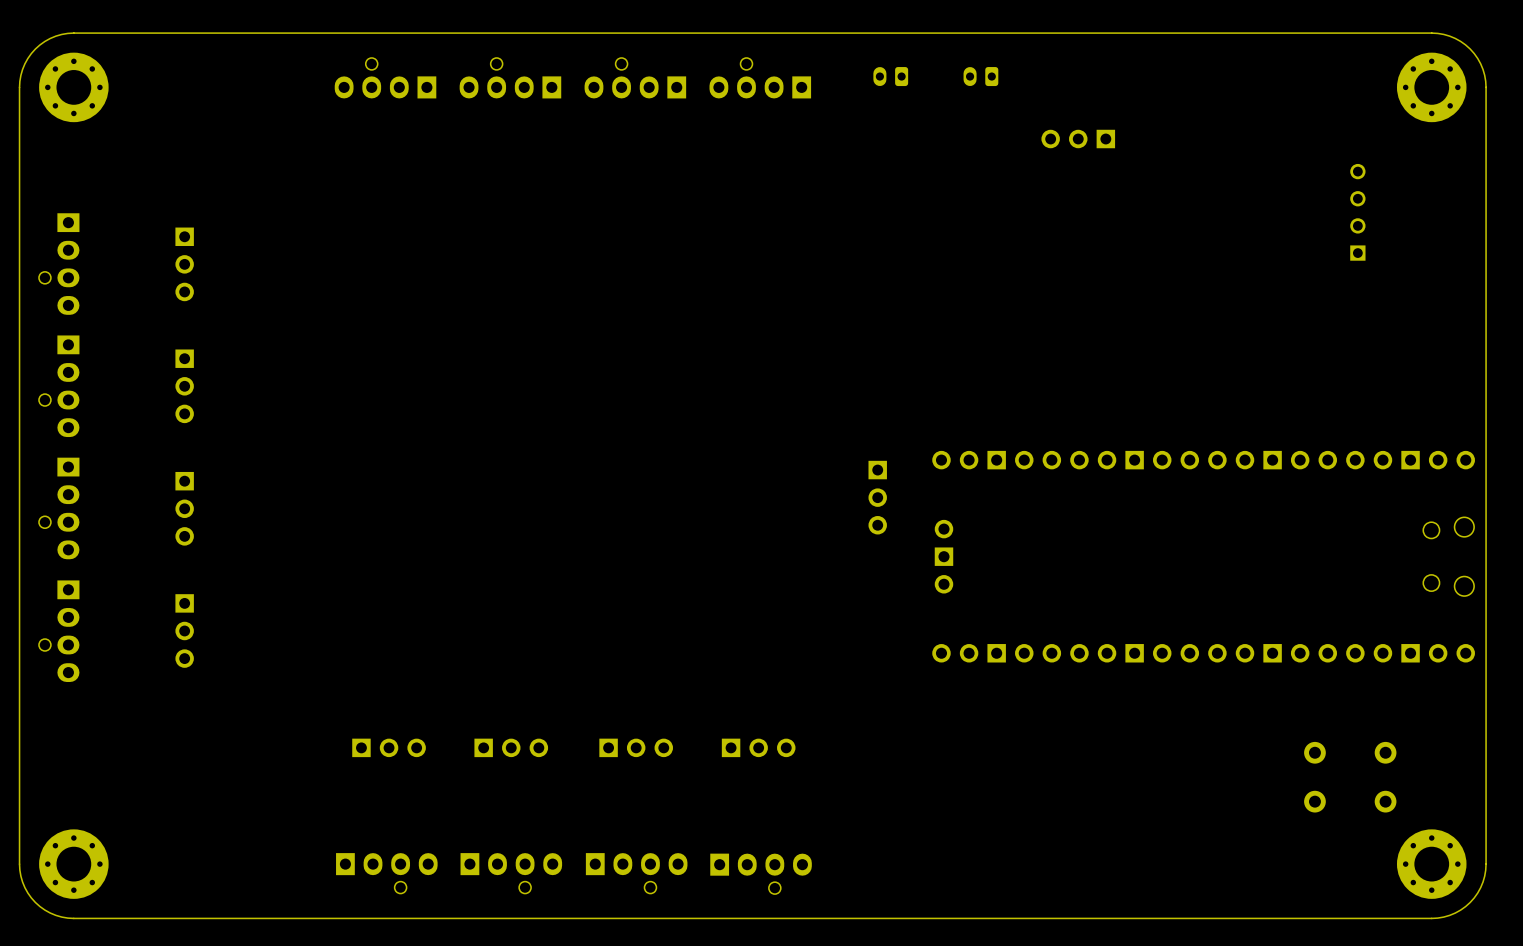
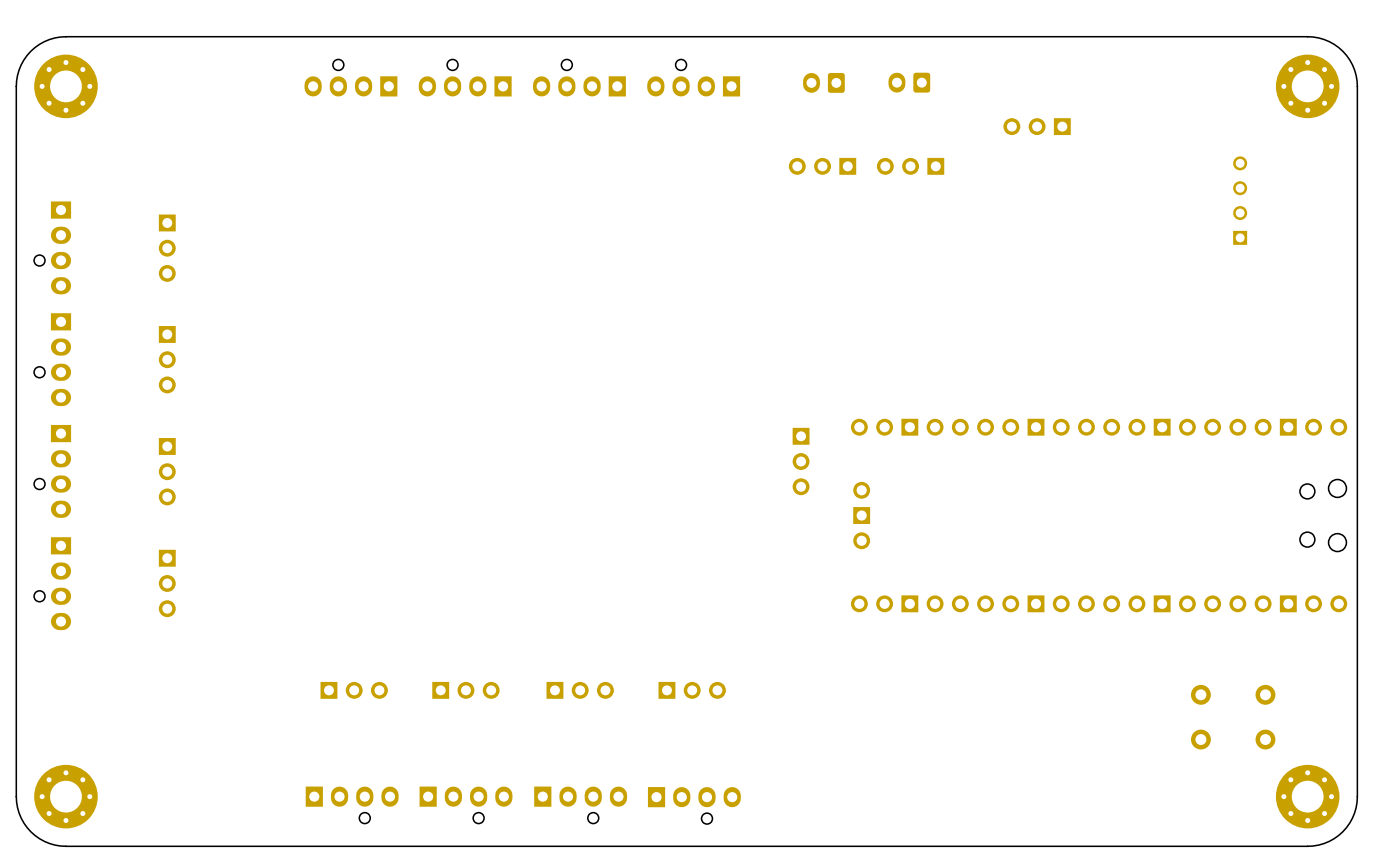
part: (890, 76) -> none
part: (980, 76) -> none
part: none -> (823, 82)
part: none -> (909, 82)
part: none -> (1037, 126)
part: (1078, 139) -> none
part: none -> (822, 166)
part: none -> (910, 166)

